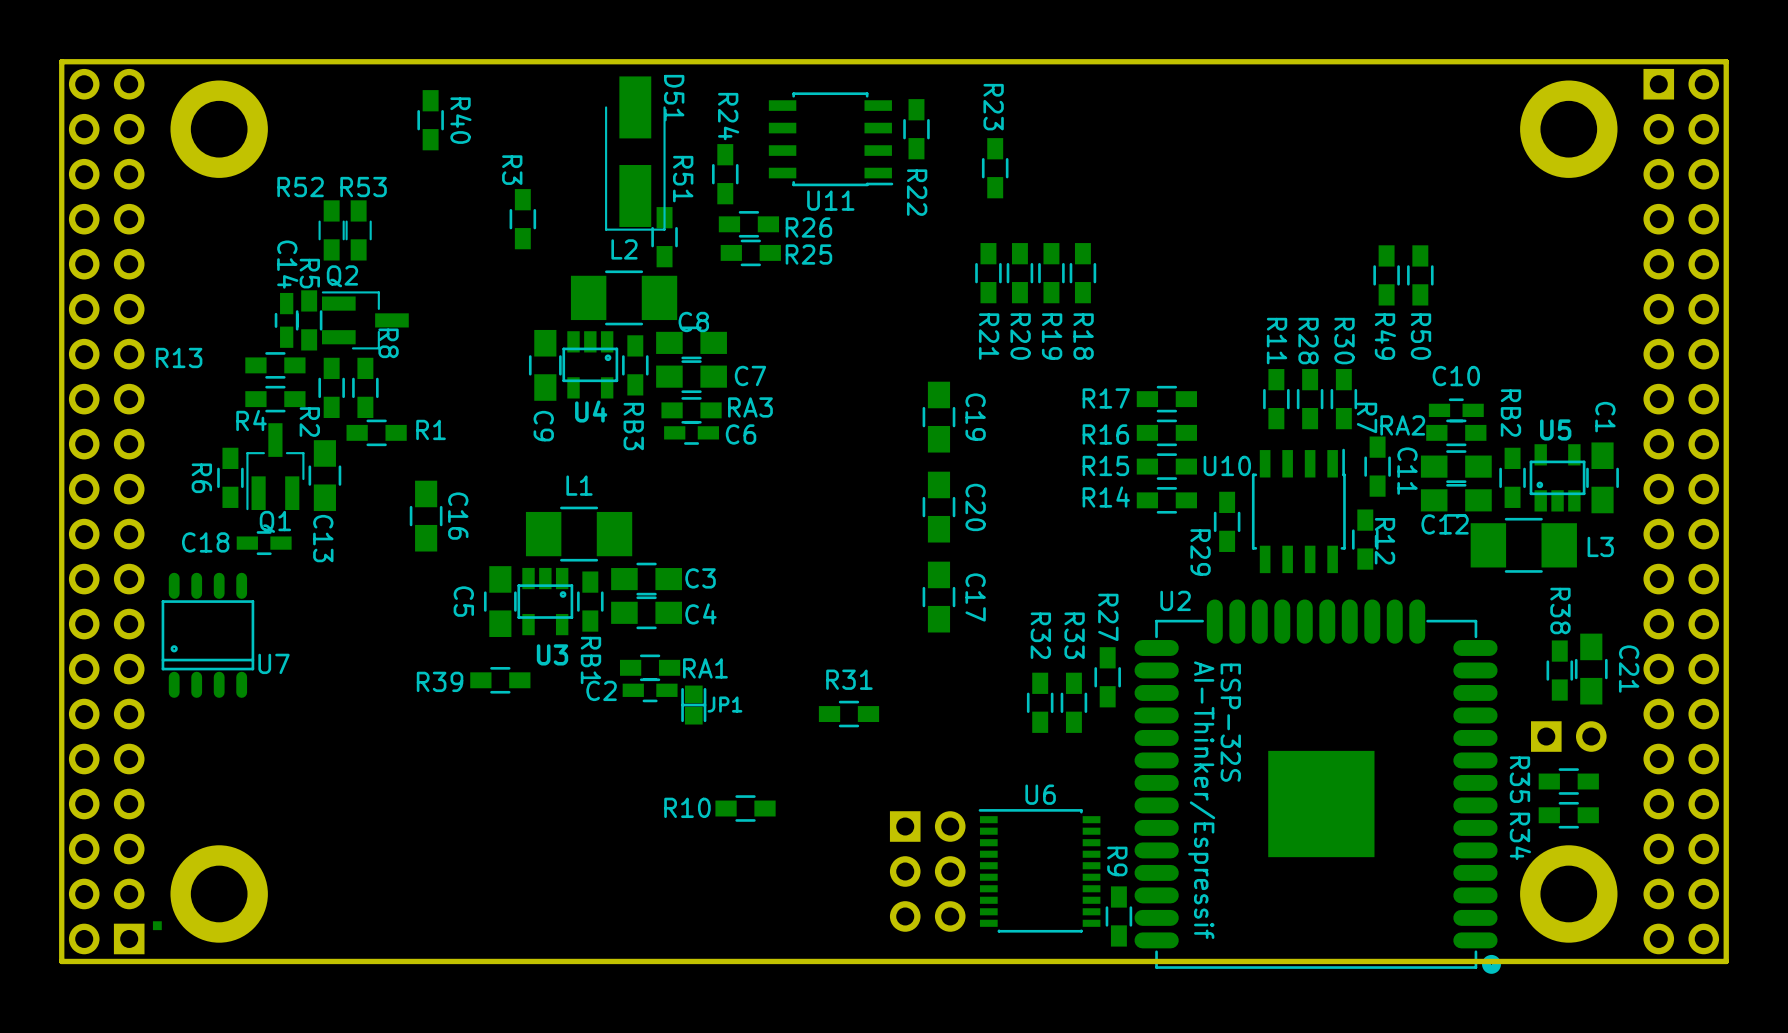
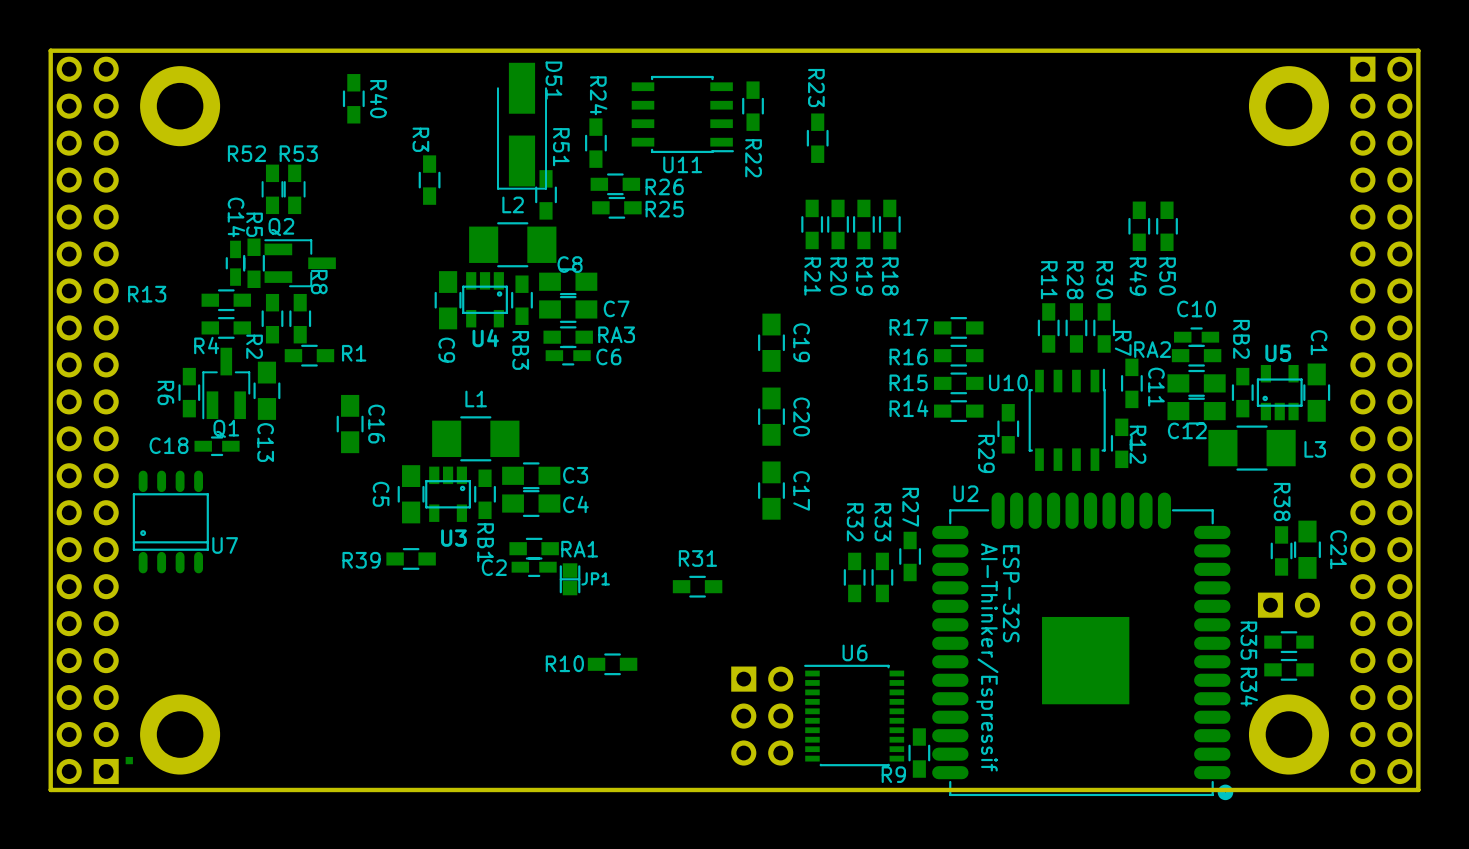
R9 name rotation: 0° (1117, 861) -> 90° counterclockwise (893, 774)
R9 name position: R9 (1117, 861) -> R9 (893, 774)

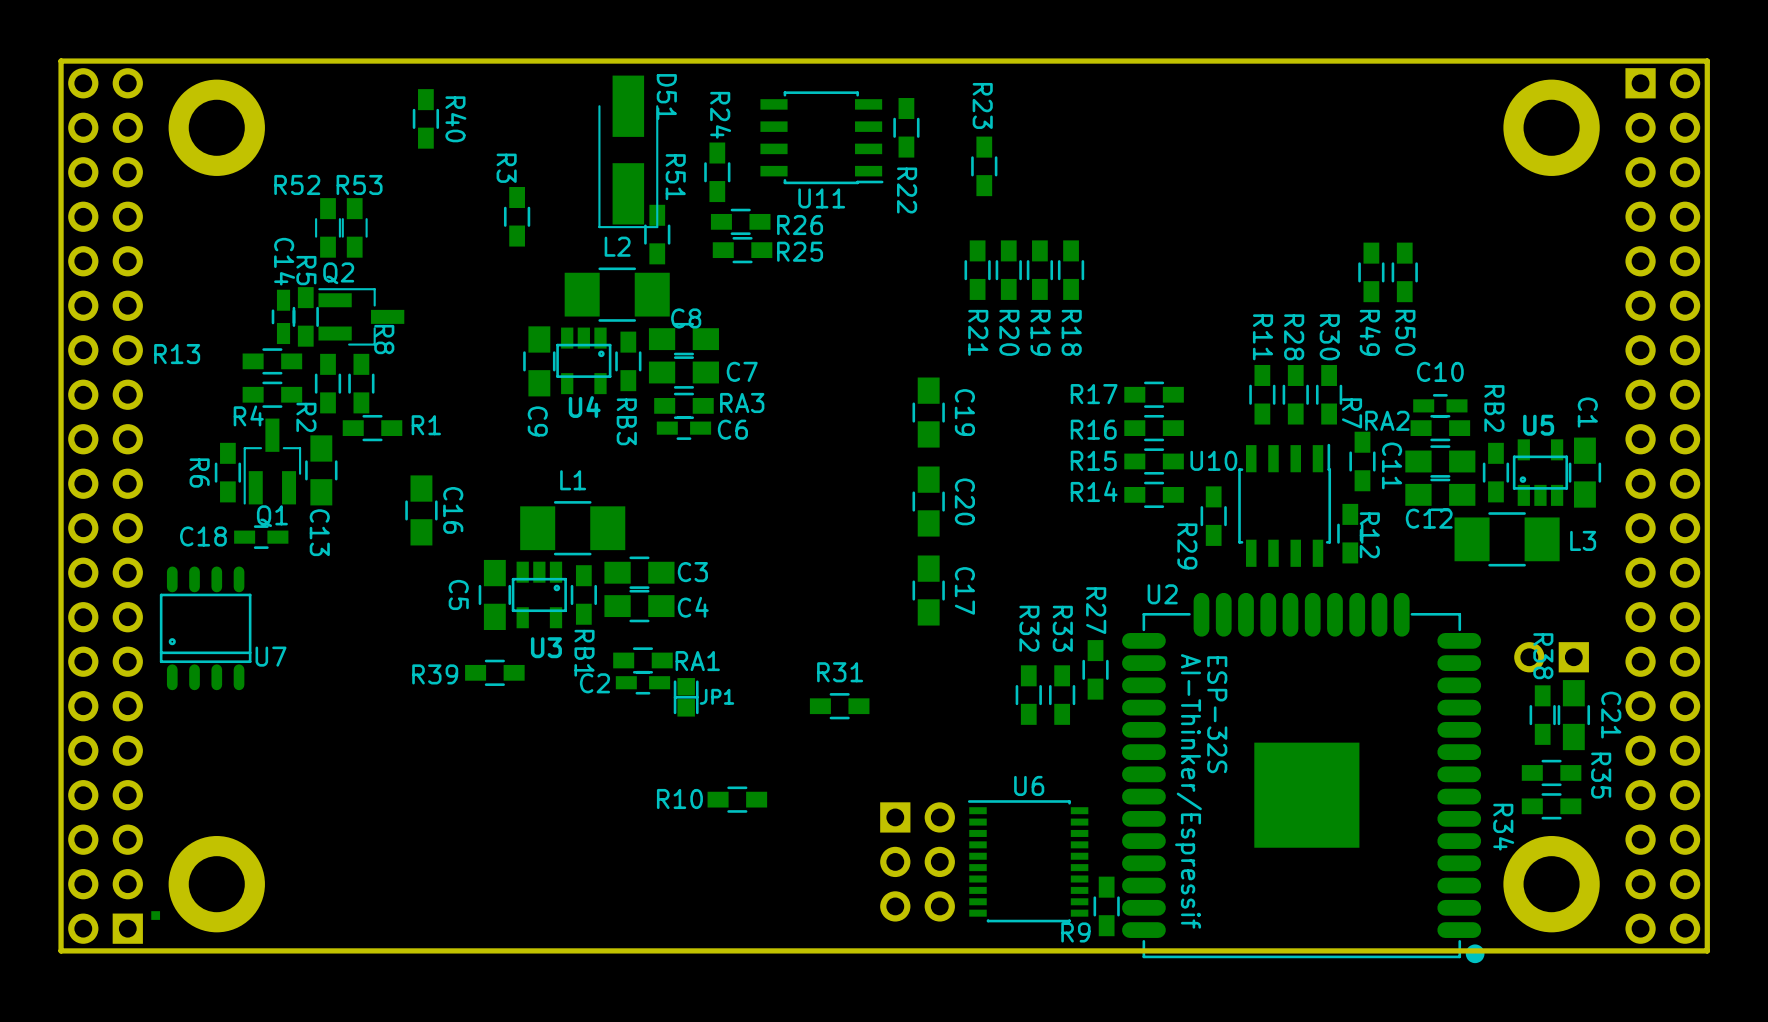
C21 position: (1307, 549) -> (1573, 715)
R38 position: (1281, 550) -> (1542, 715)
part rotation: 0° (1288, 605) -> 180° (1551, 657)
part position: (1288, 605) -> (1551, 657)
R35 name position: R35 (1248, 640) -> R35 (1601, 775)

